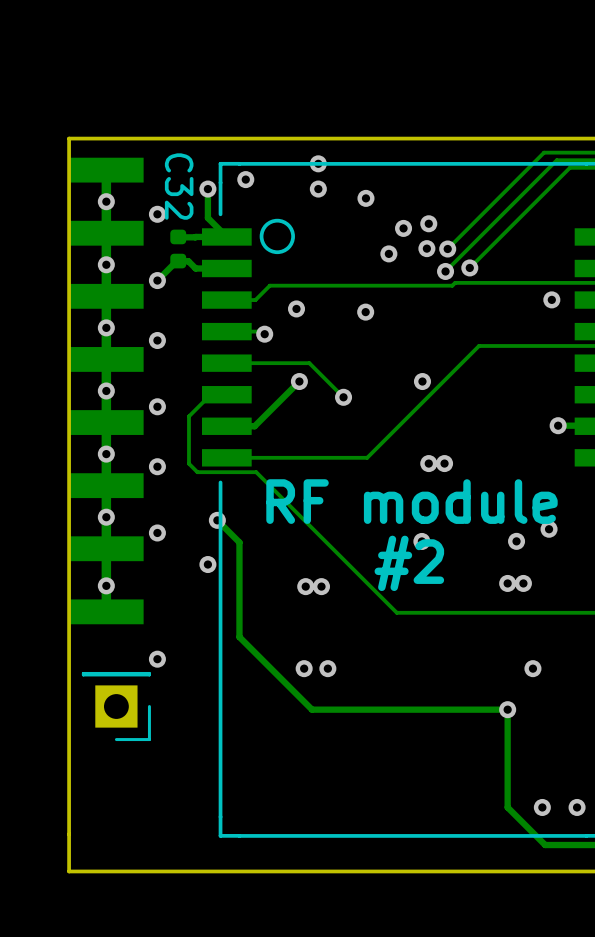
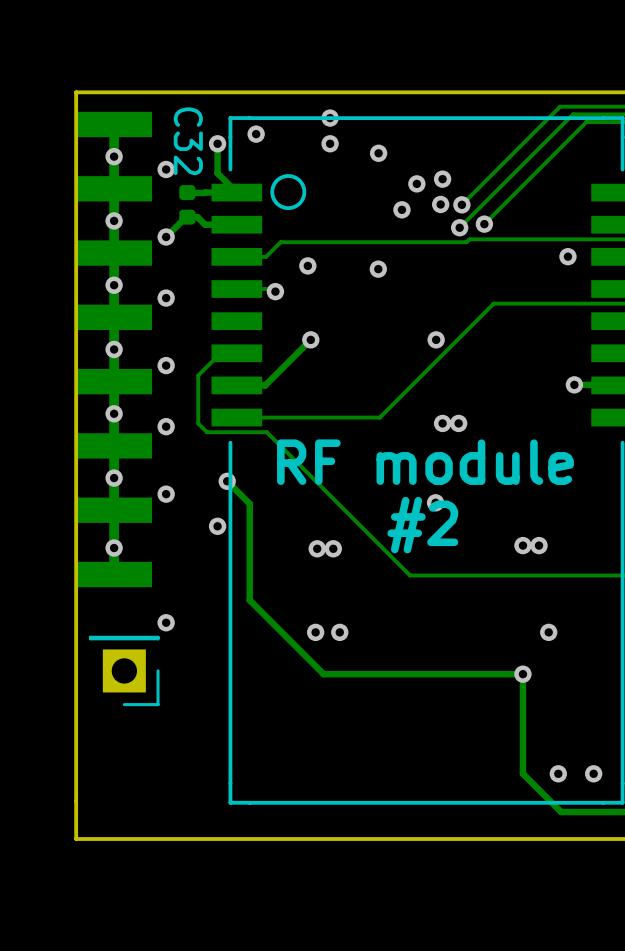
track: (226, 363) (309, 363) (343, 397) -> none
via: (343, 397) -> none
via: (549, 529) -> none
via: (516, 541) -> none

